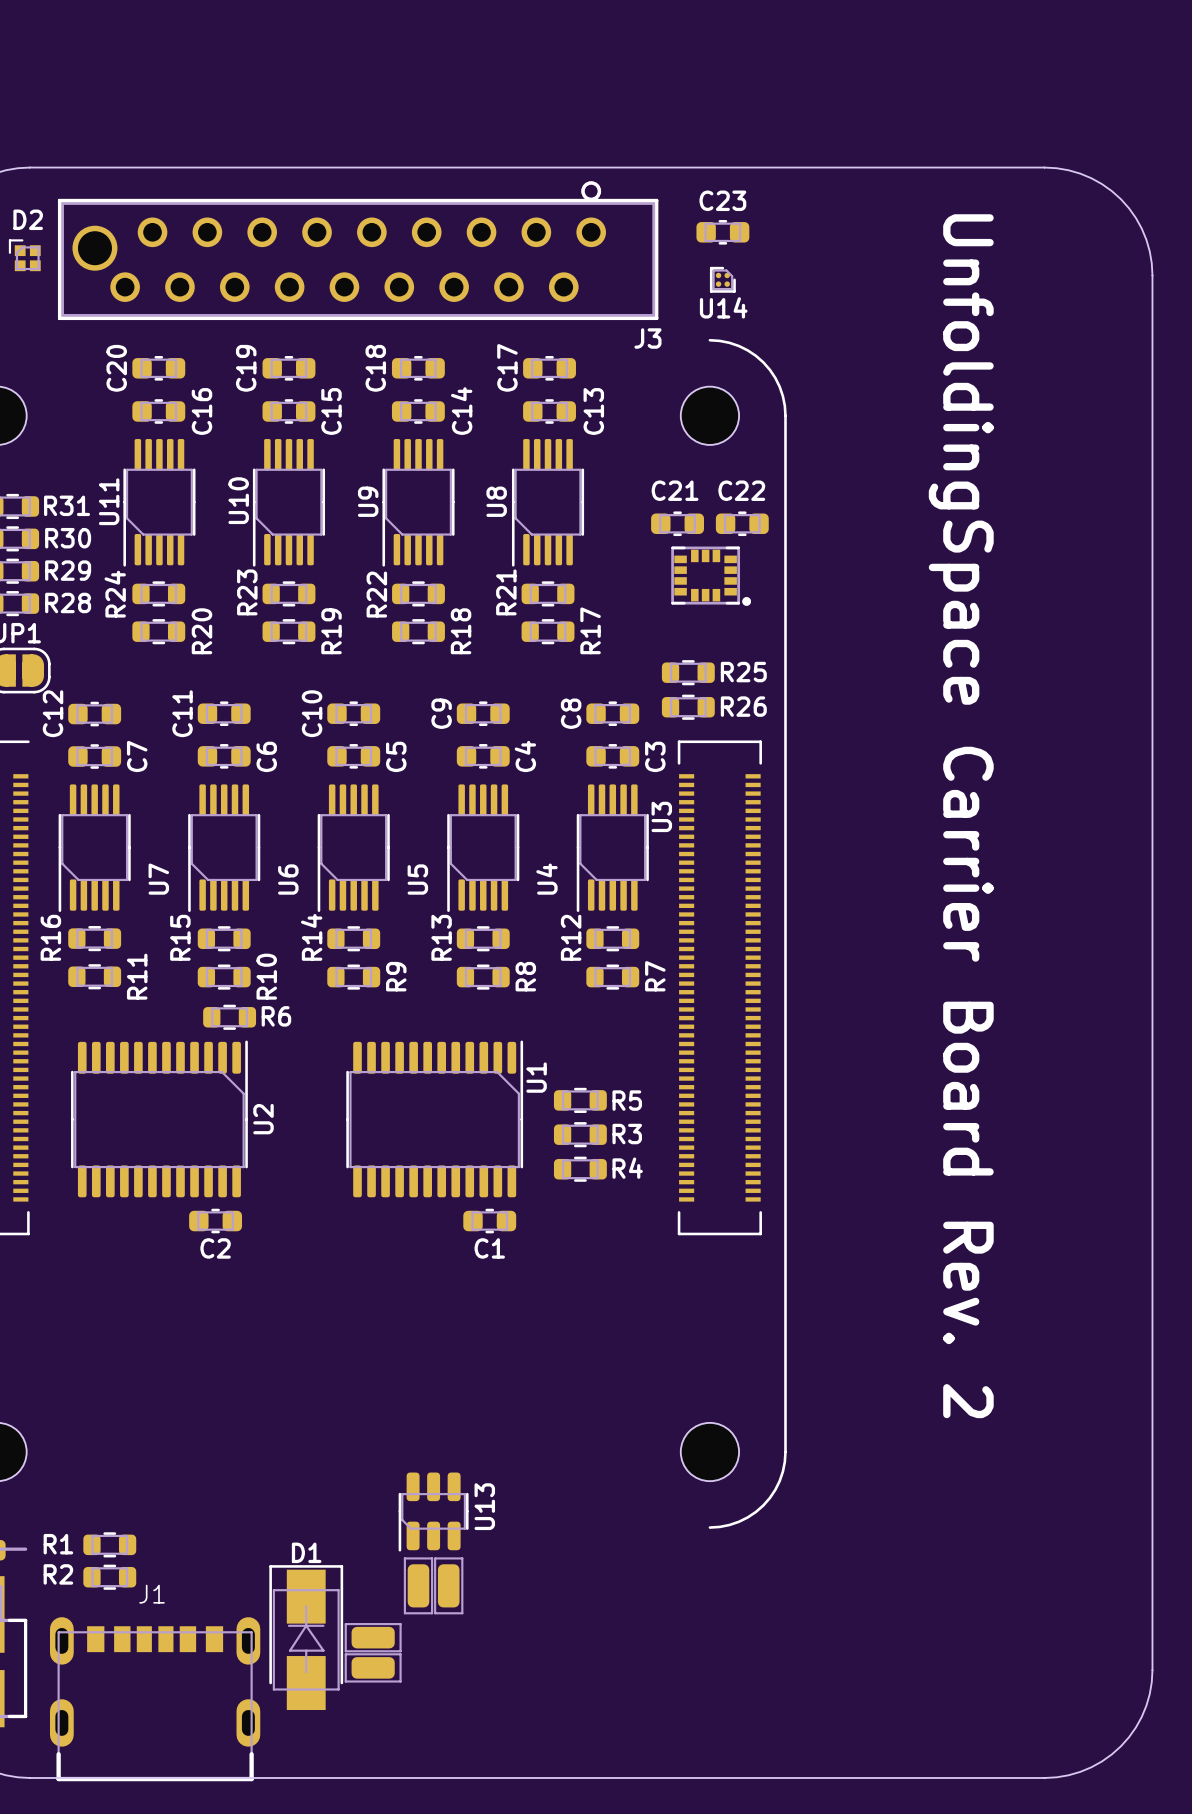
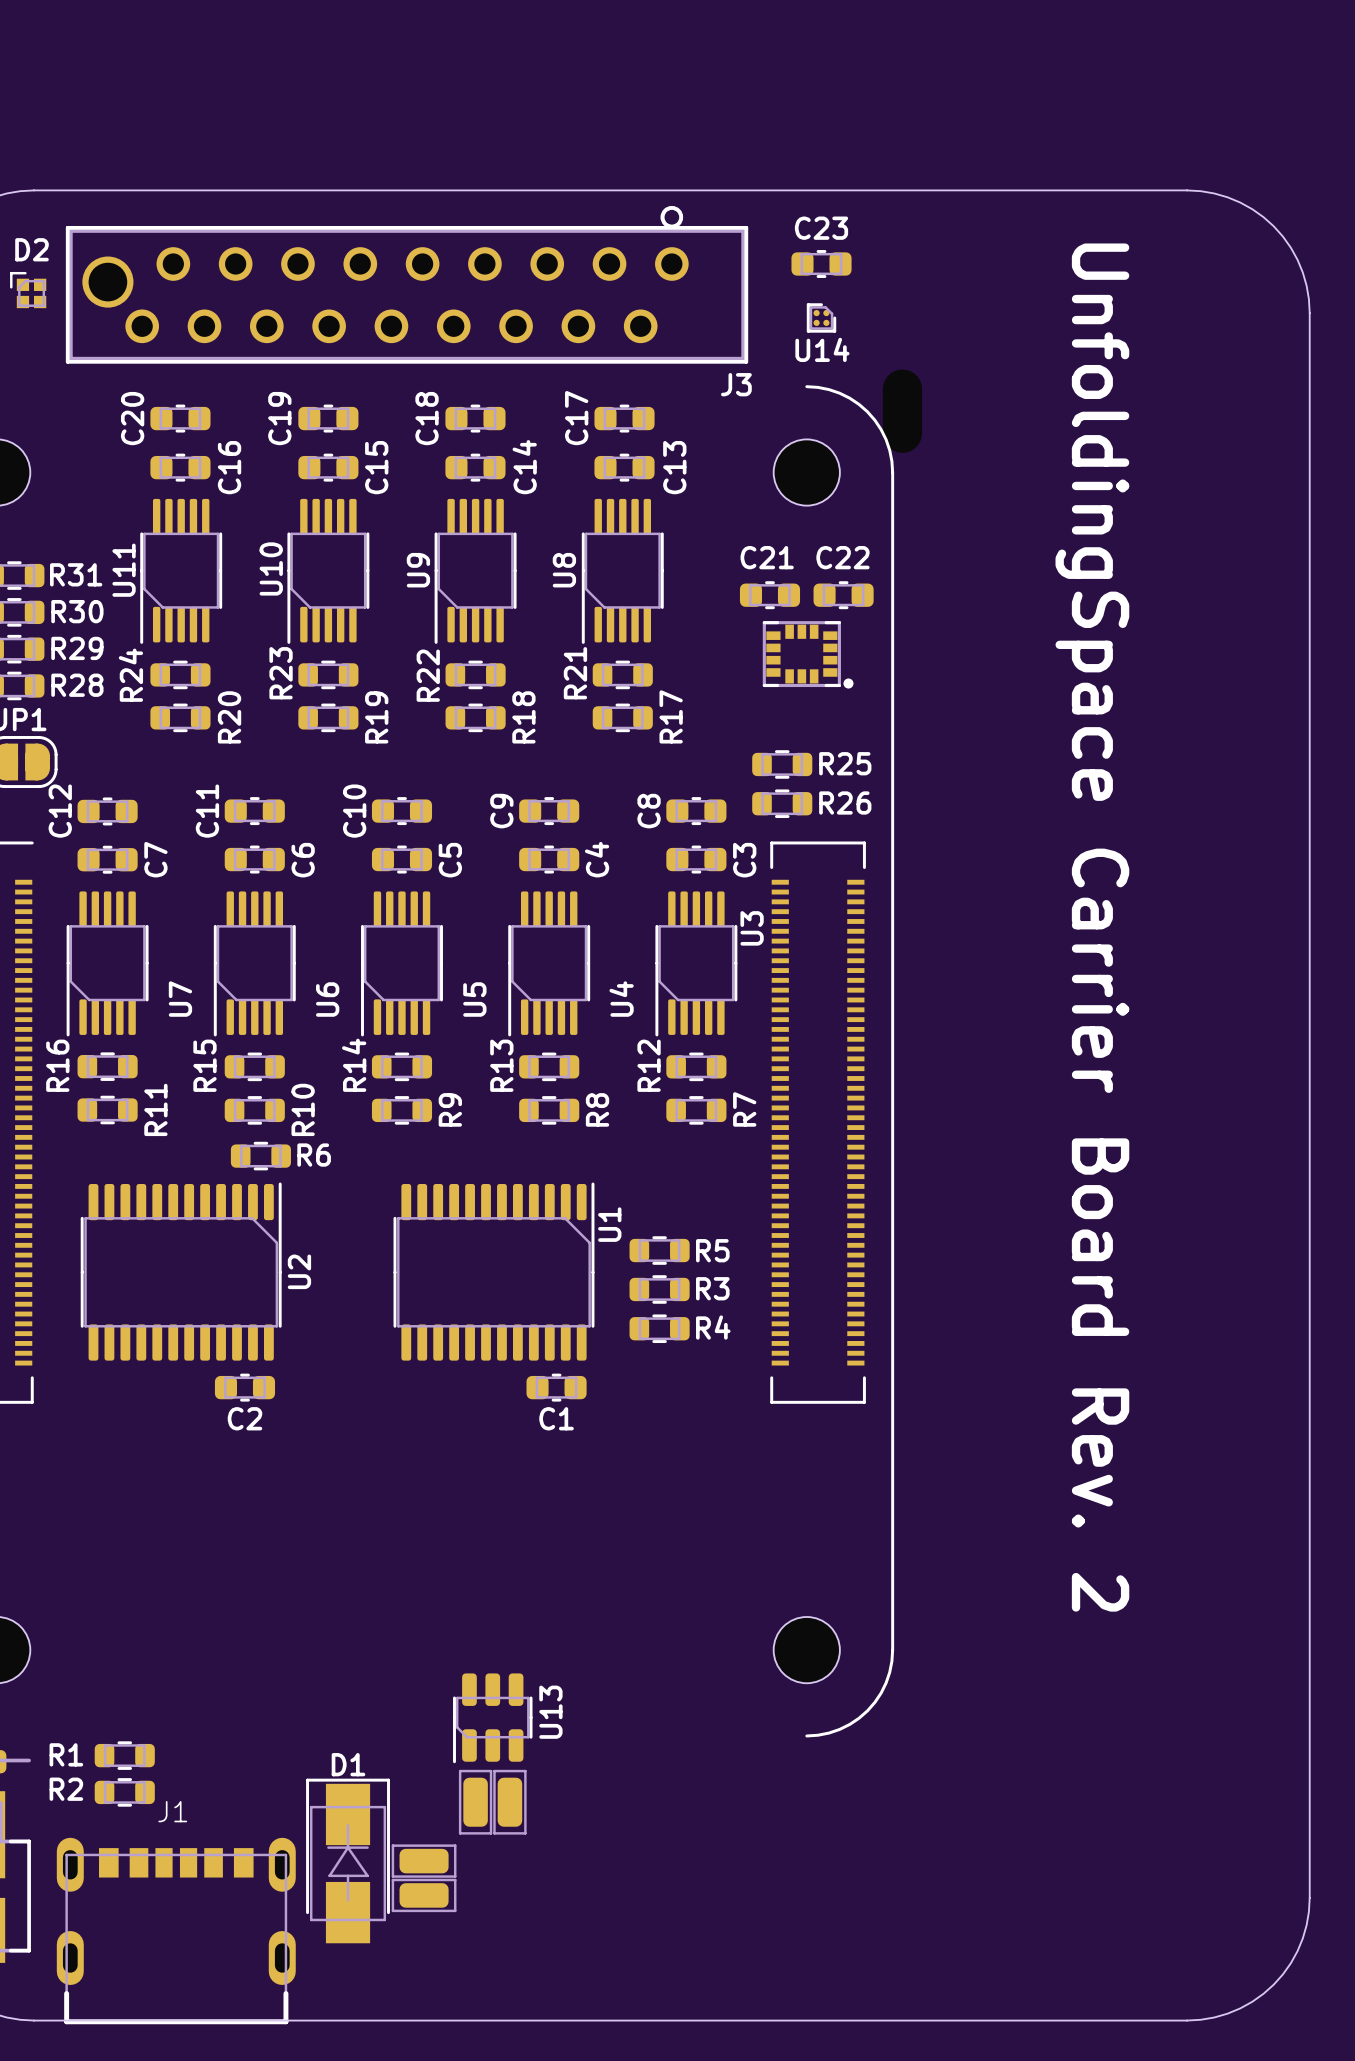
part: none -> (902, 411)

